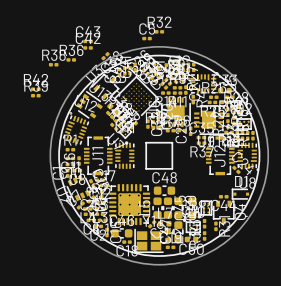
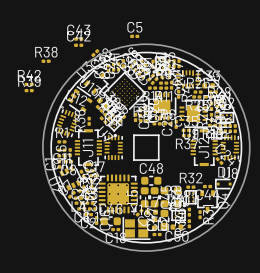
R32 position: (159, 31) -> (190, 187)
R36 rotation: 0° (71, 59) -> 90° clockwise (89, 121)
R36 position: (71, 59) -> (89, 121)

